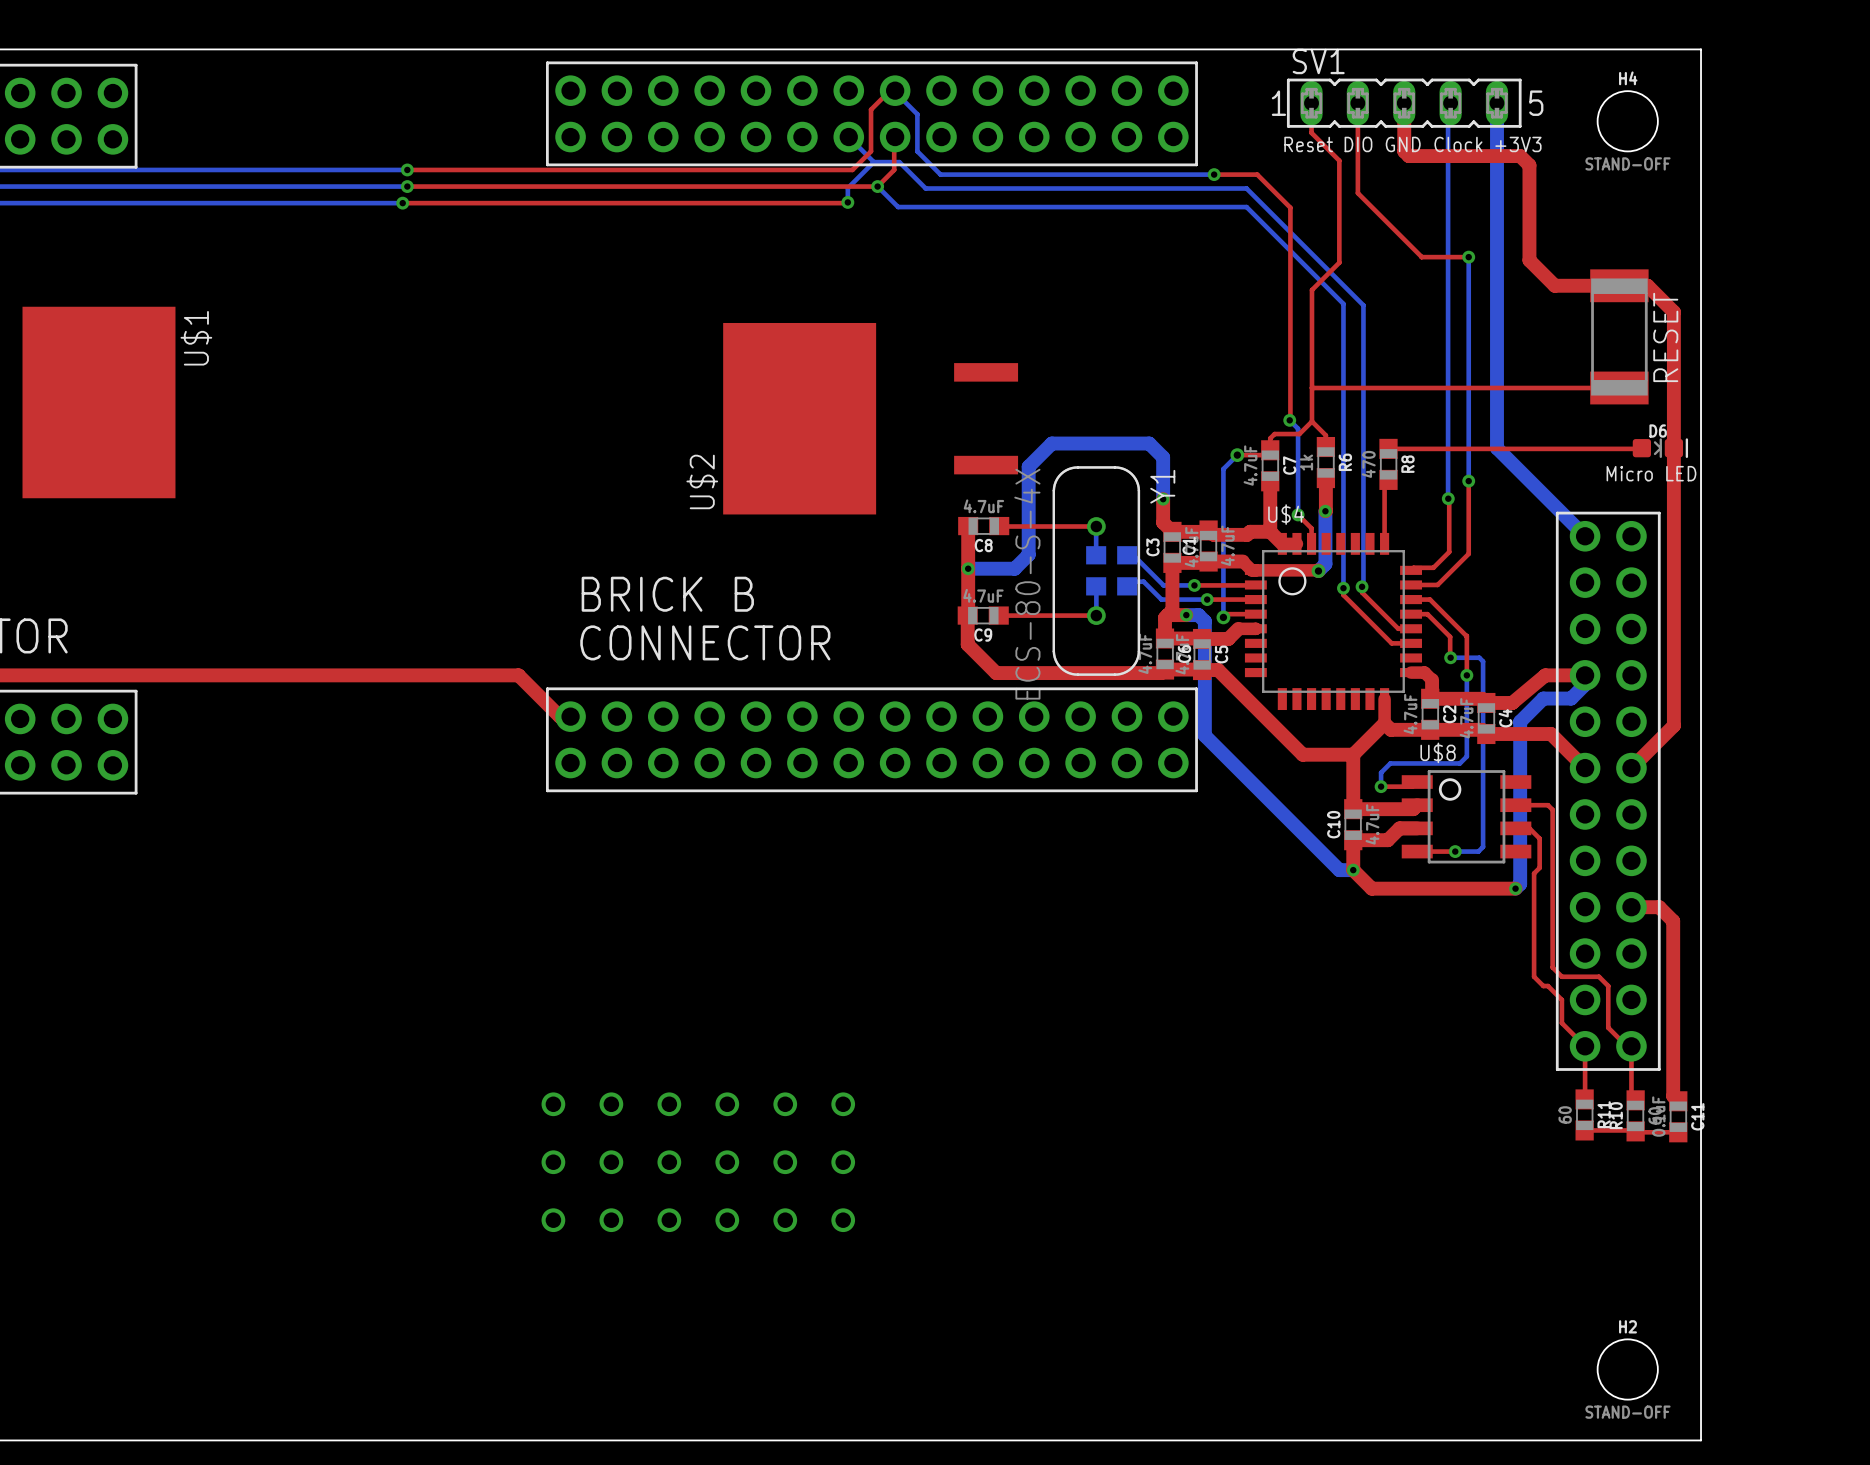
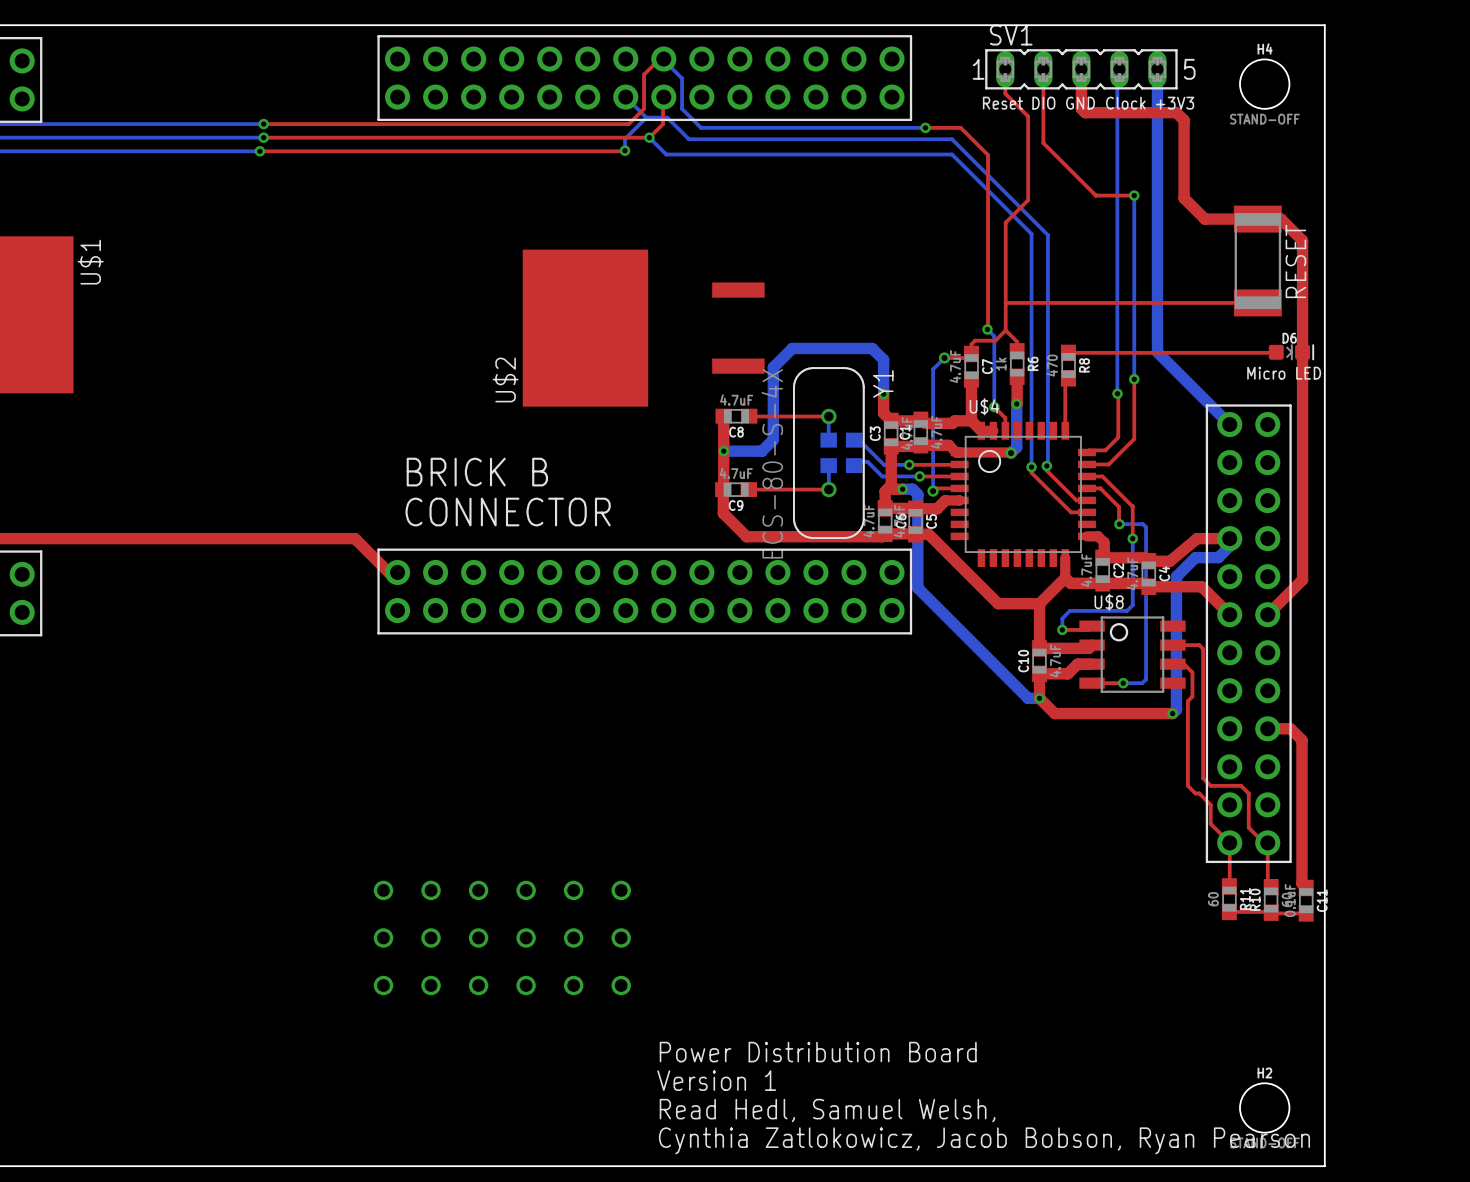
text: none -> Power Distribution Board (818, 1052)
text: none -> Version 1 (716, 1080)
text: none -> Read Hedl, Samuel Welsh, (827, 1110)
text: none -> Cynthia Zatlokowicz, Jacob Bobson, Ryan Pearson (984, 1140)

